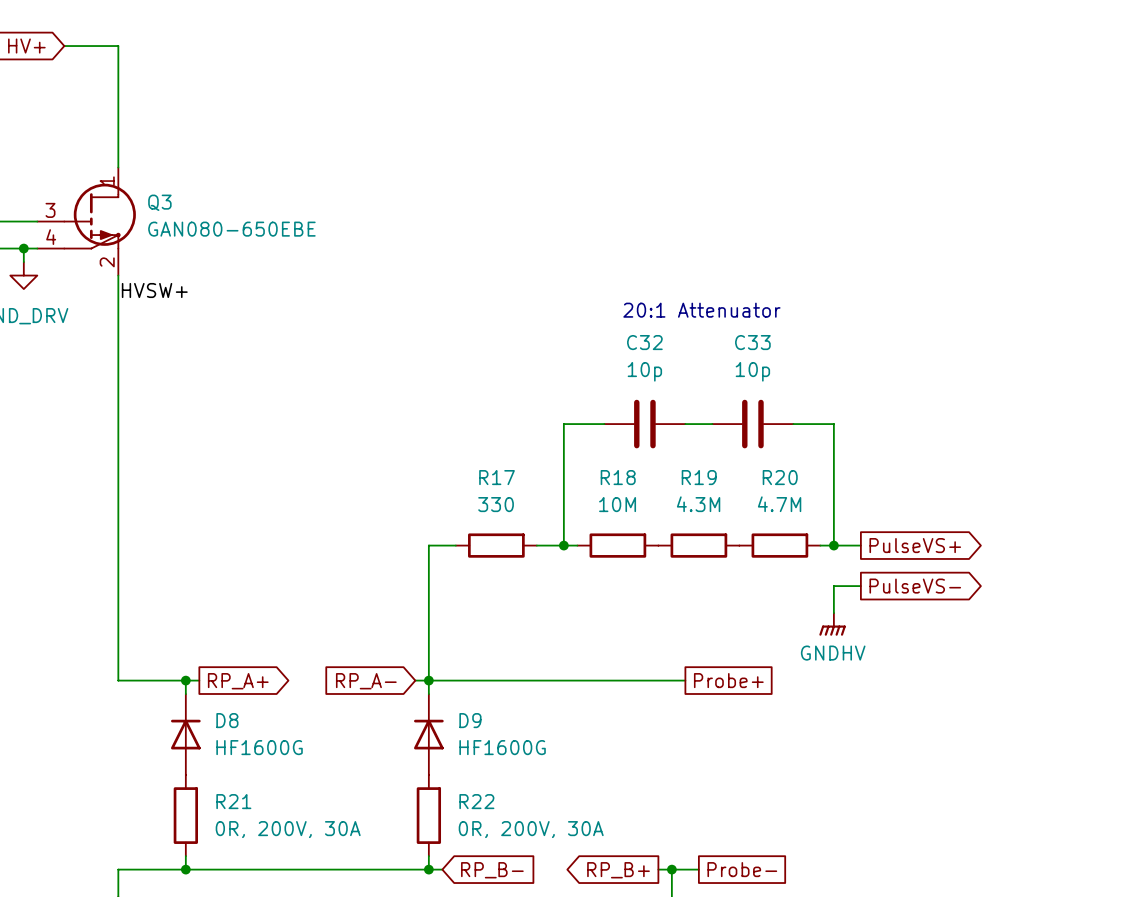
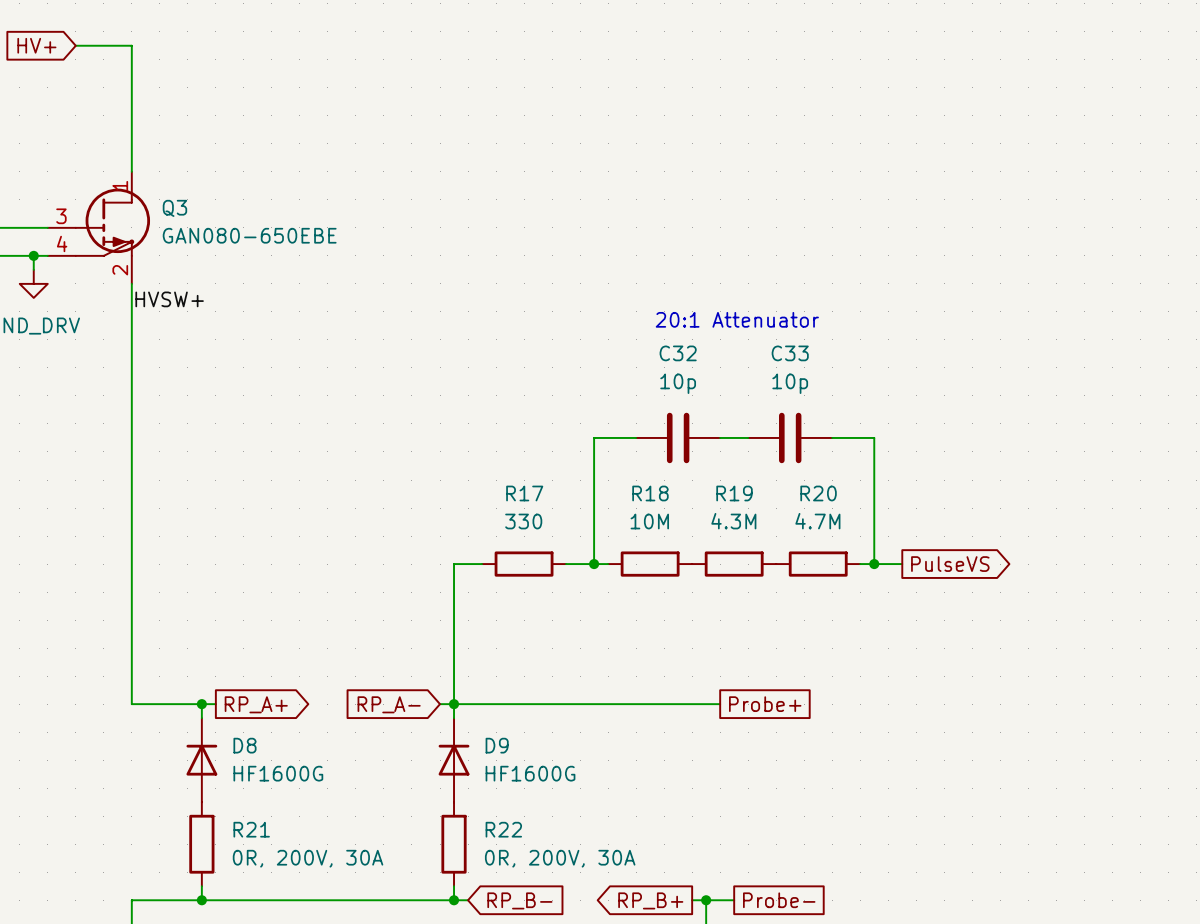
global label: PulseVS+ (915, 545) -> PulseVS (950, 564)
wire: (860, 586) (833, 586) (833, 613) -> none
global label: PulseVS- (915, 586) -> none
power symbol: GNDHV (832, 624) -> none

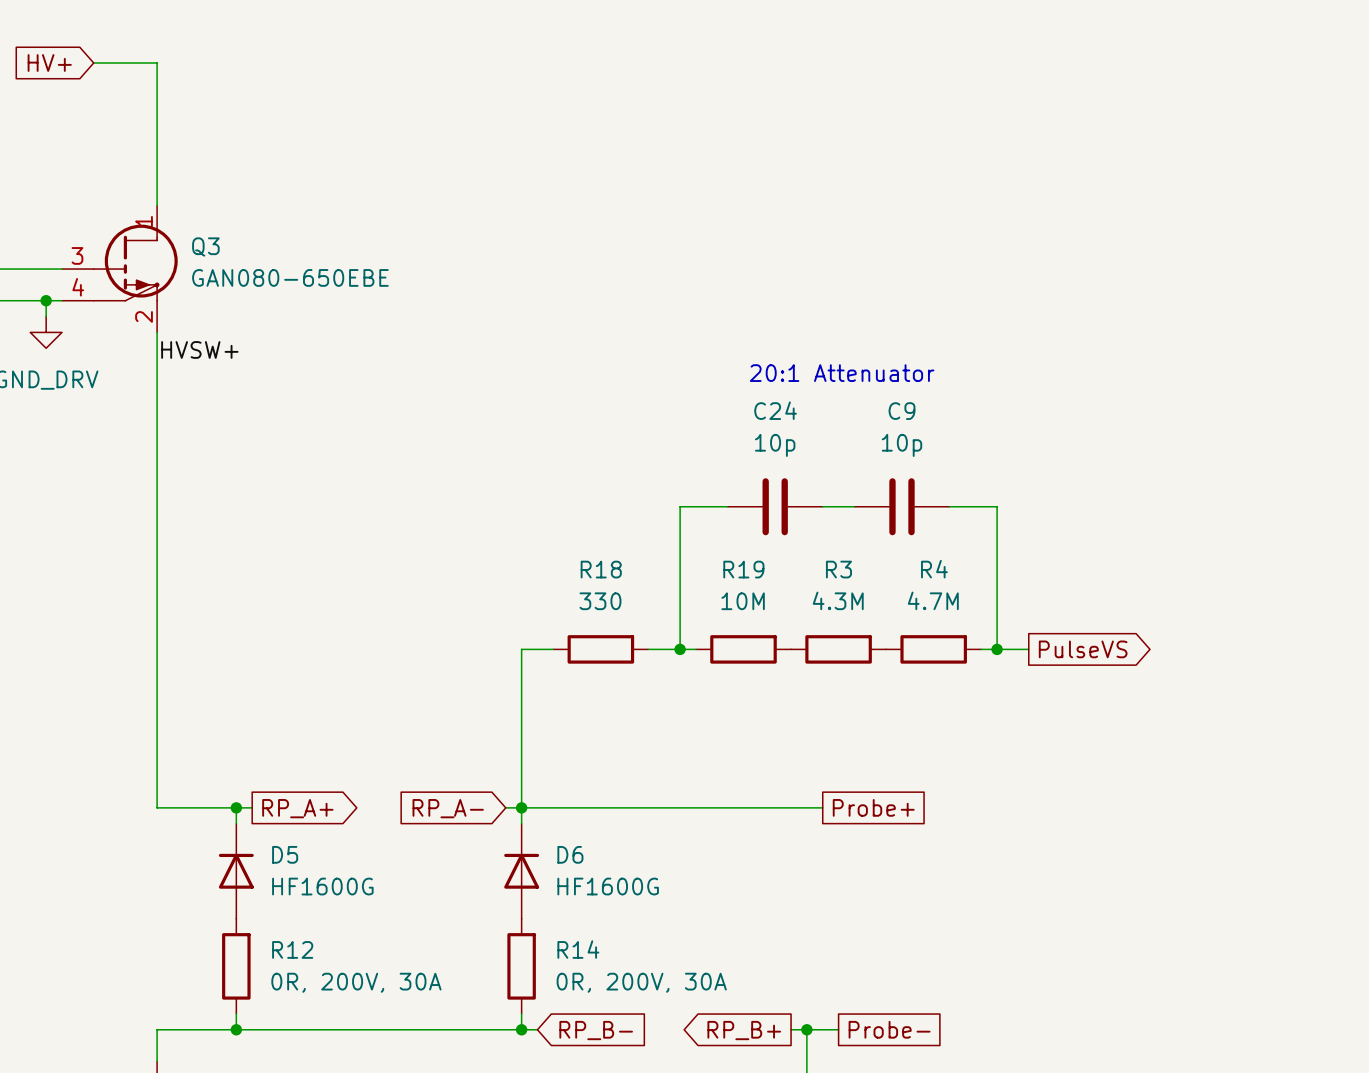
C32 name: C32 (678, 353) -> C24 (775, 410)
C33 name: C33 (790, 353) -> C9 (901, 411)
R17 name: R17 (524, 493) -> R18 (601, 569)
R18 name: R18 (650, 493) -> R19 (743, 569)
R19 name: R19 (734, 493) -> R3 (838, 569)
R20 name: R20 (818, 493) -> R4 (934, 569)
D8 name: D8 (244, 745) -> D5 (285, 854)
D9 name: D9 (497, 745) -> D6 (570, 854)
R21 name: R21 (251, 829) -> R12 (292, 949)
R22 name: R22 (503, 829) -> R14 (578, 949)

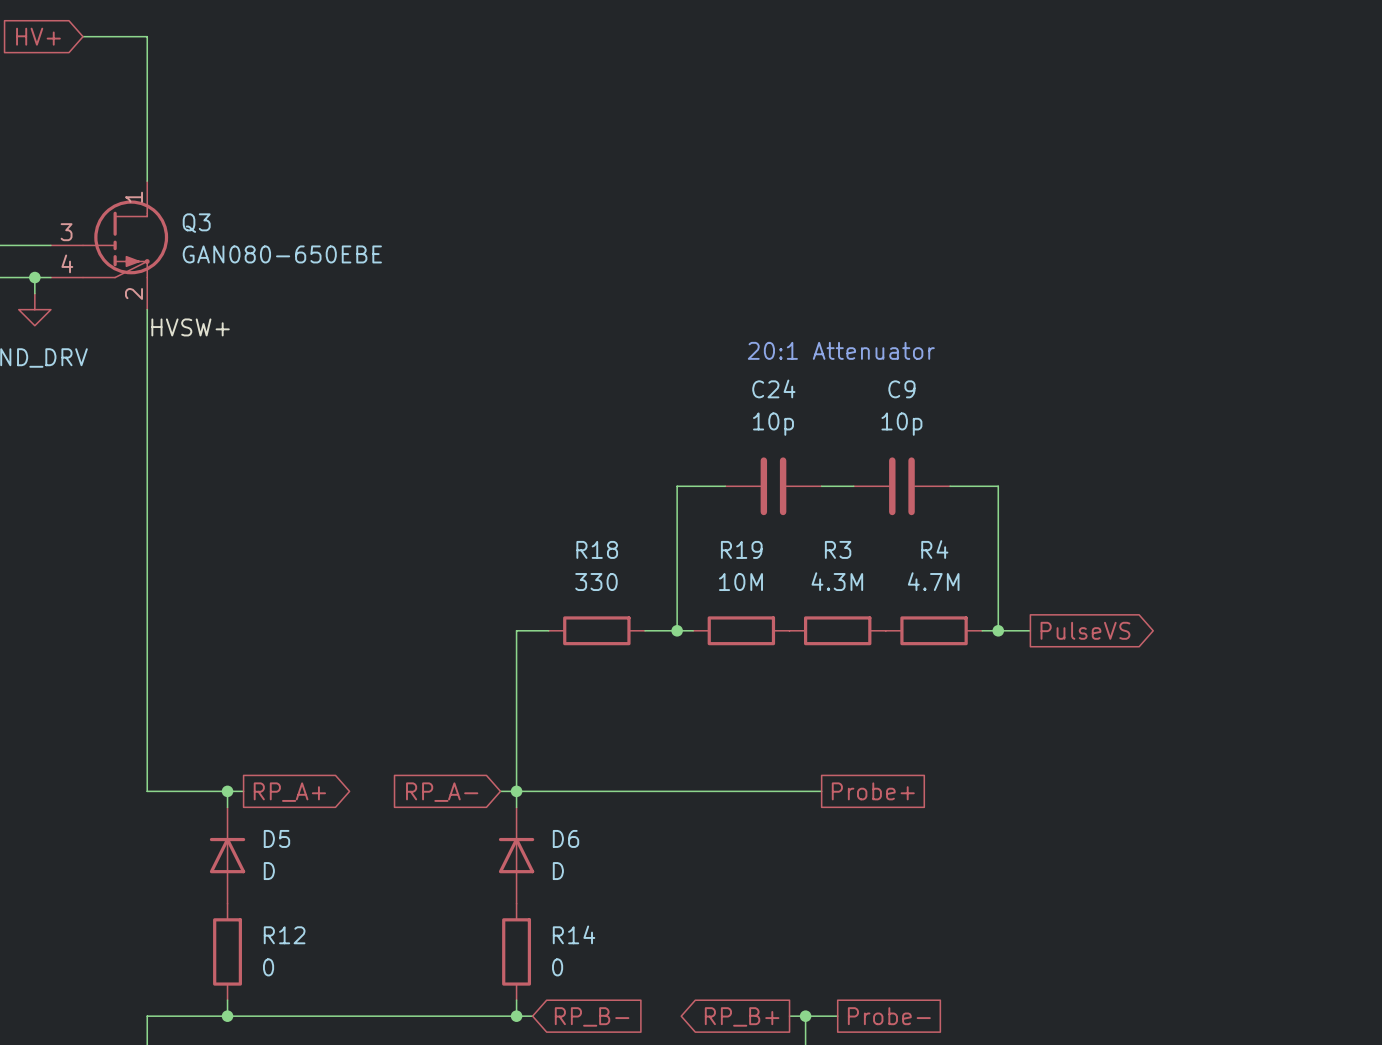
D5 value: HF1600G (322, 886) -> D (269, 871)
D6 value: HF1600G (608, 886) -> D (558, 871)
R12 value: 0R, 200V, 30A (356, 982) -> 0 (268, 967)
R14 value: 0R, 200V, 30A (641, 982) -> 0 (557, 967)

